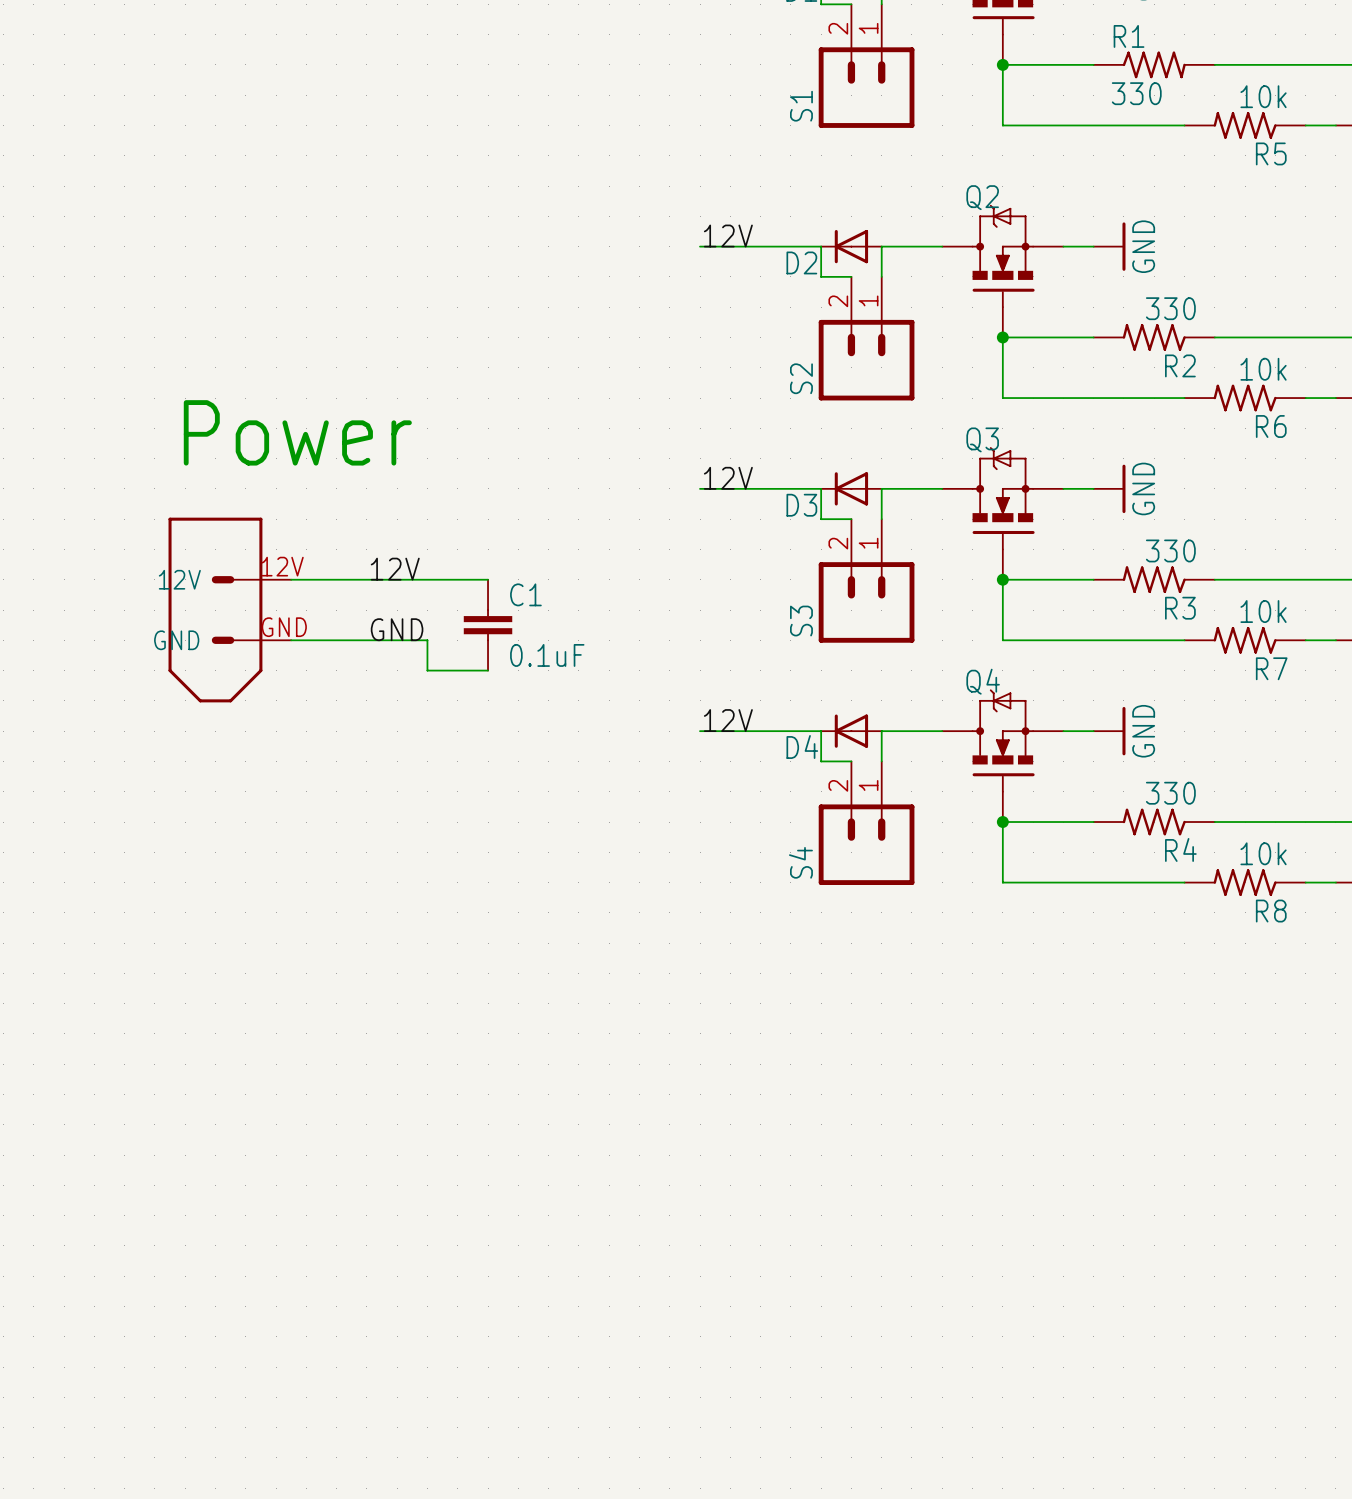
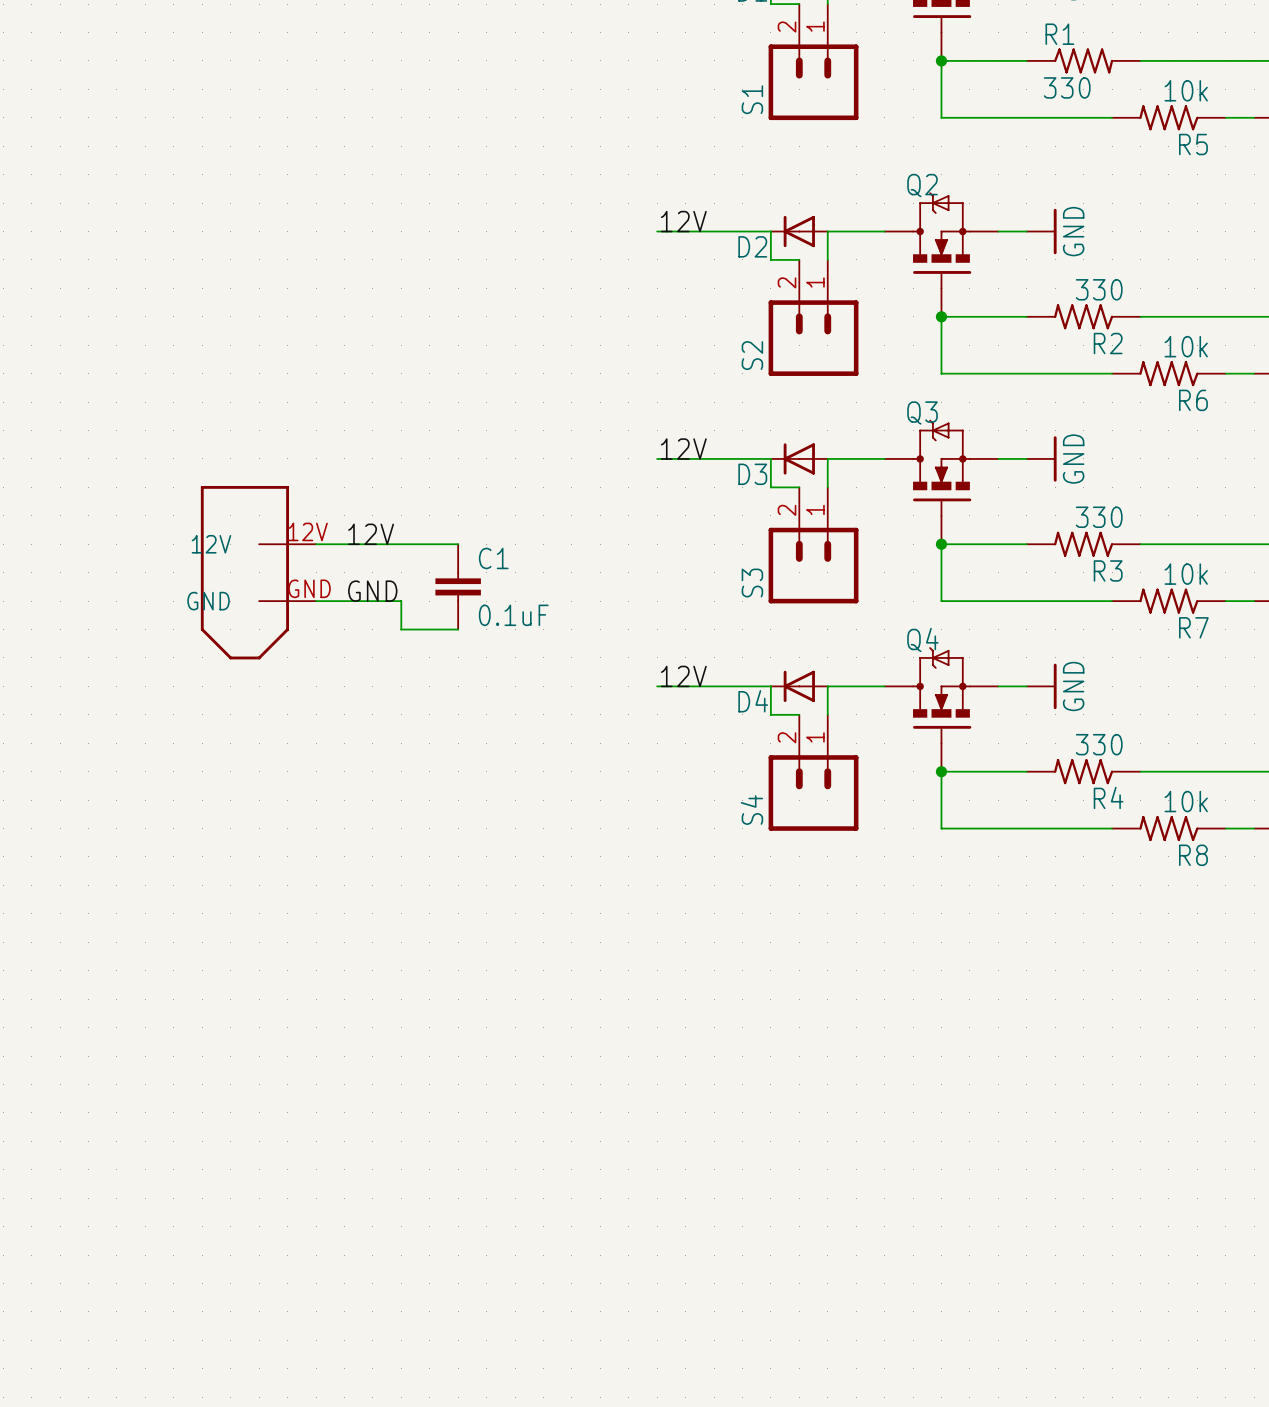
text: Power (297, 432) -> none
part: (229, 610) -> none
part: none -> (258, 572)

